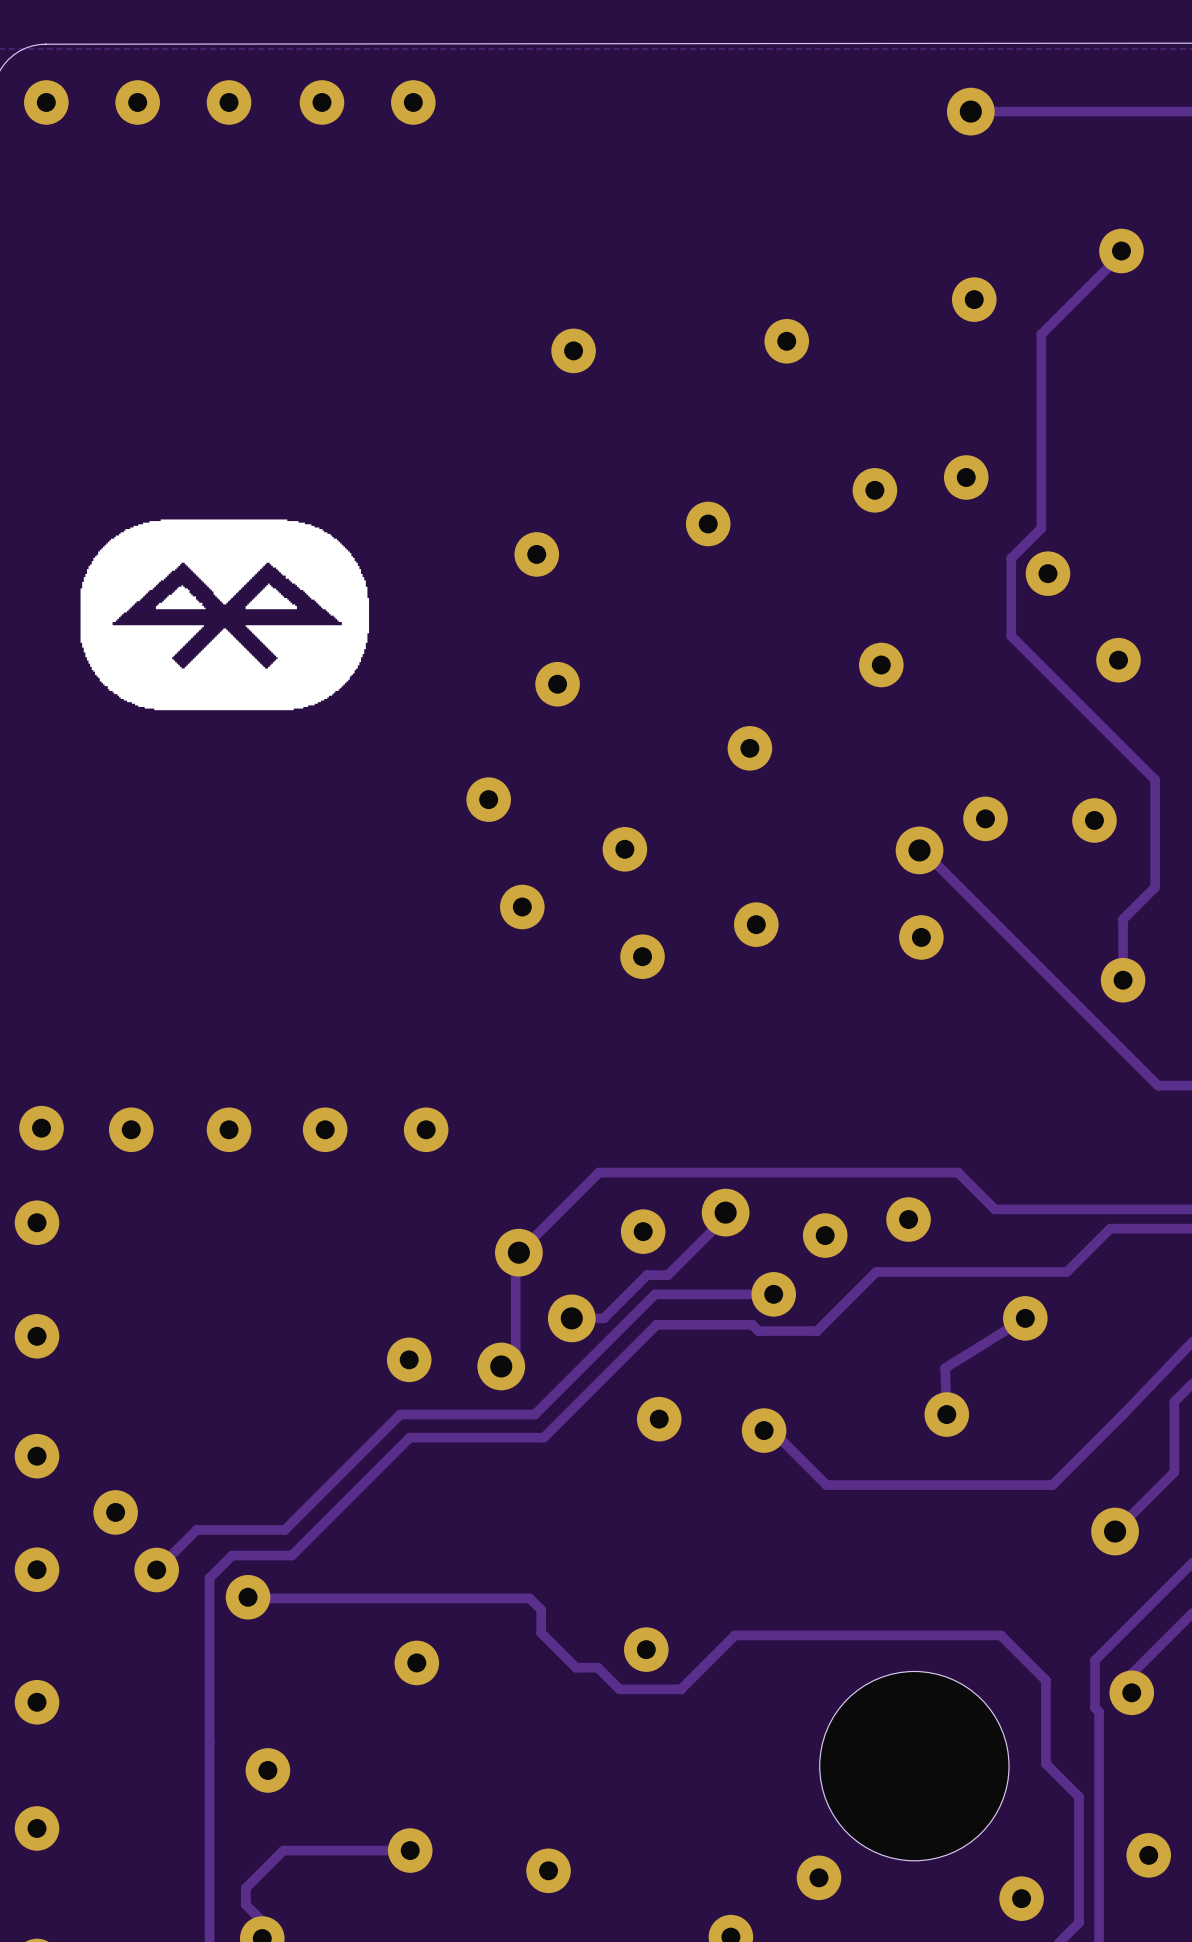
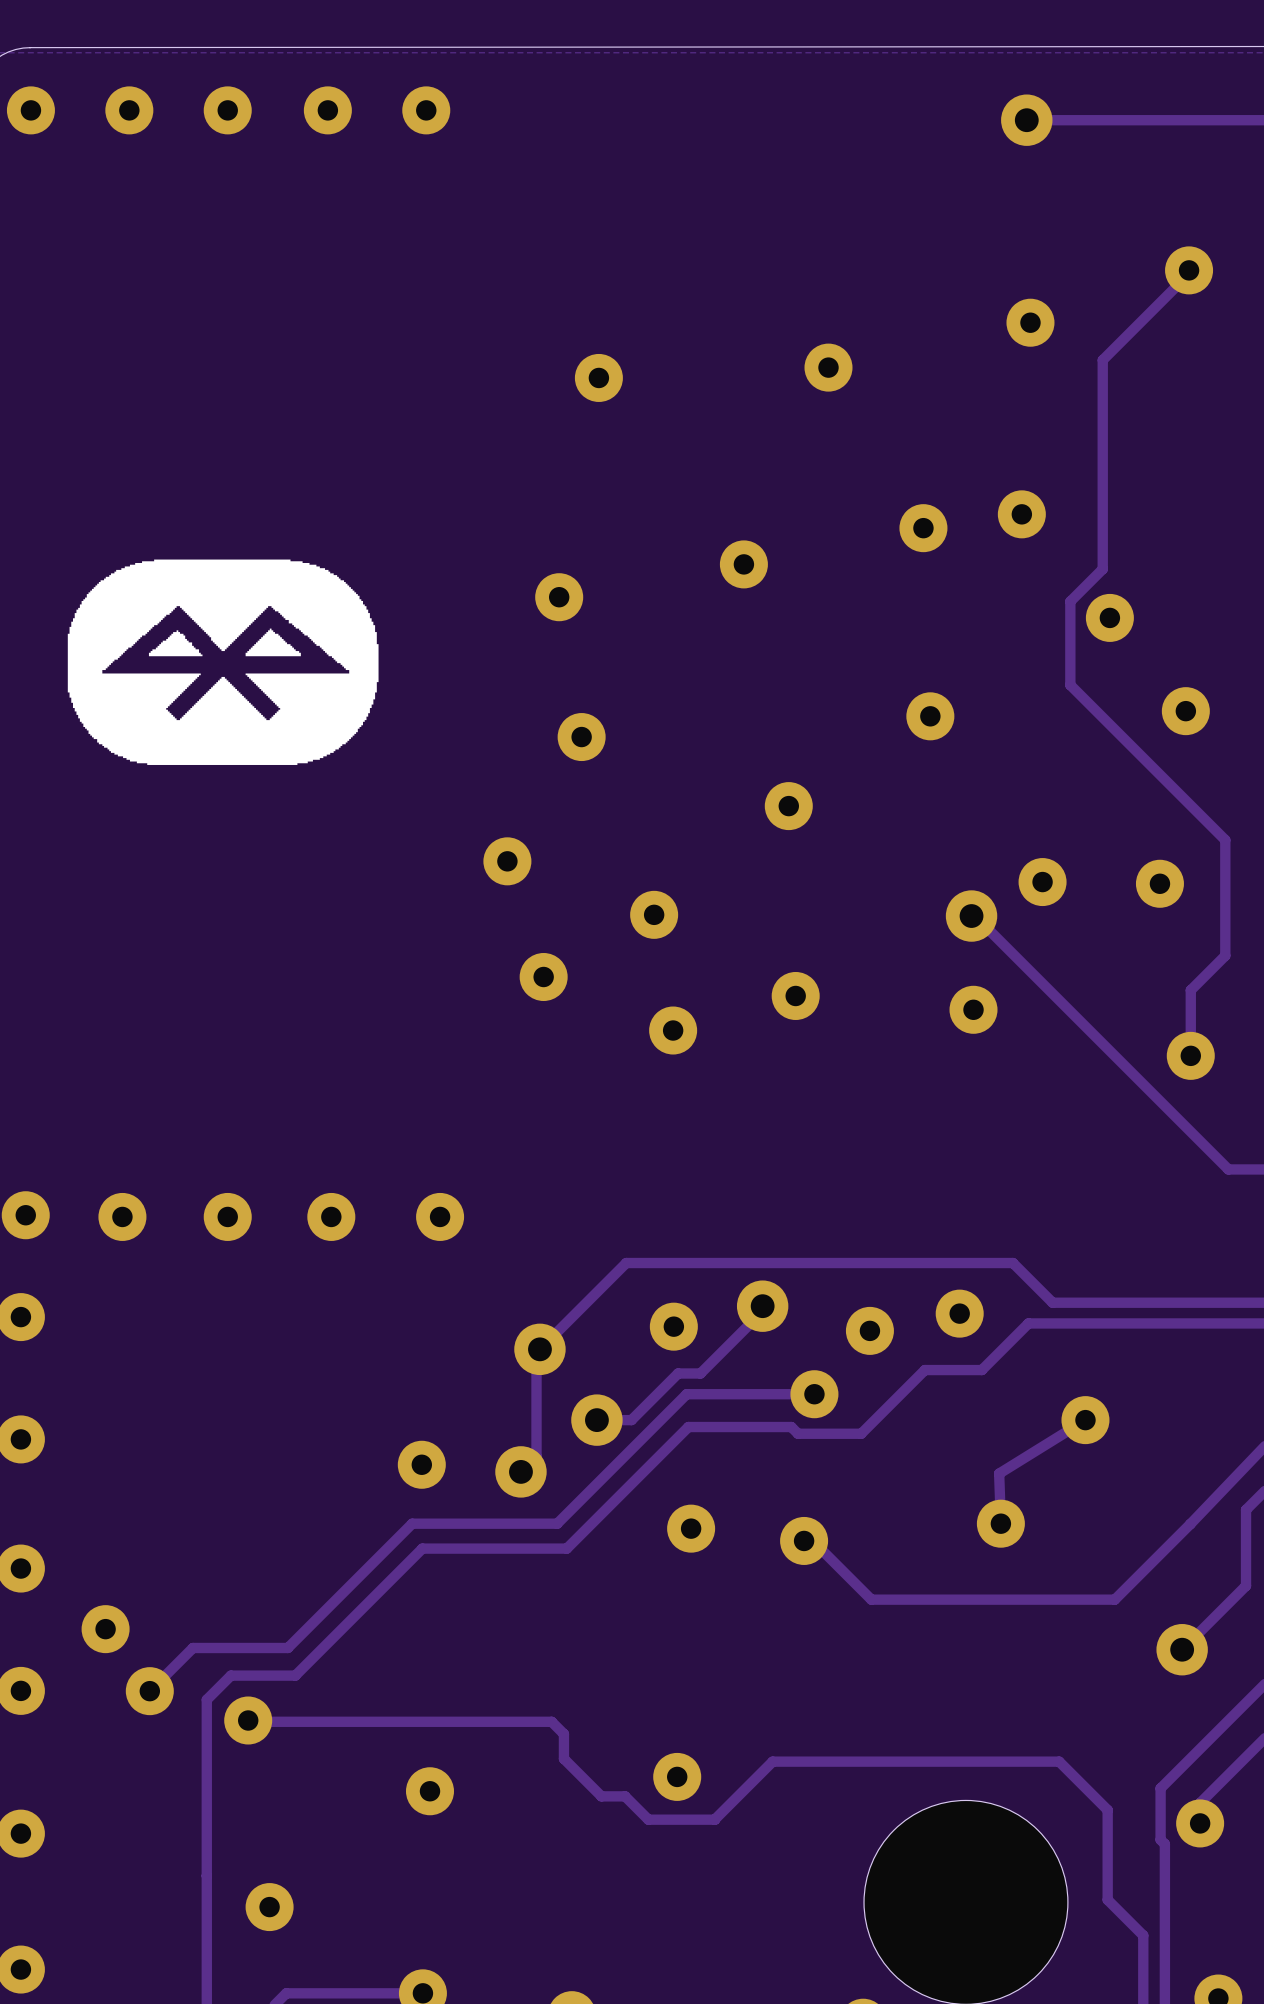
track: (1110, 1228) (1066, 1271) (929, 1271) -> (1176, 1323) (1028, 1323) (981, 1370)

